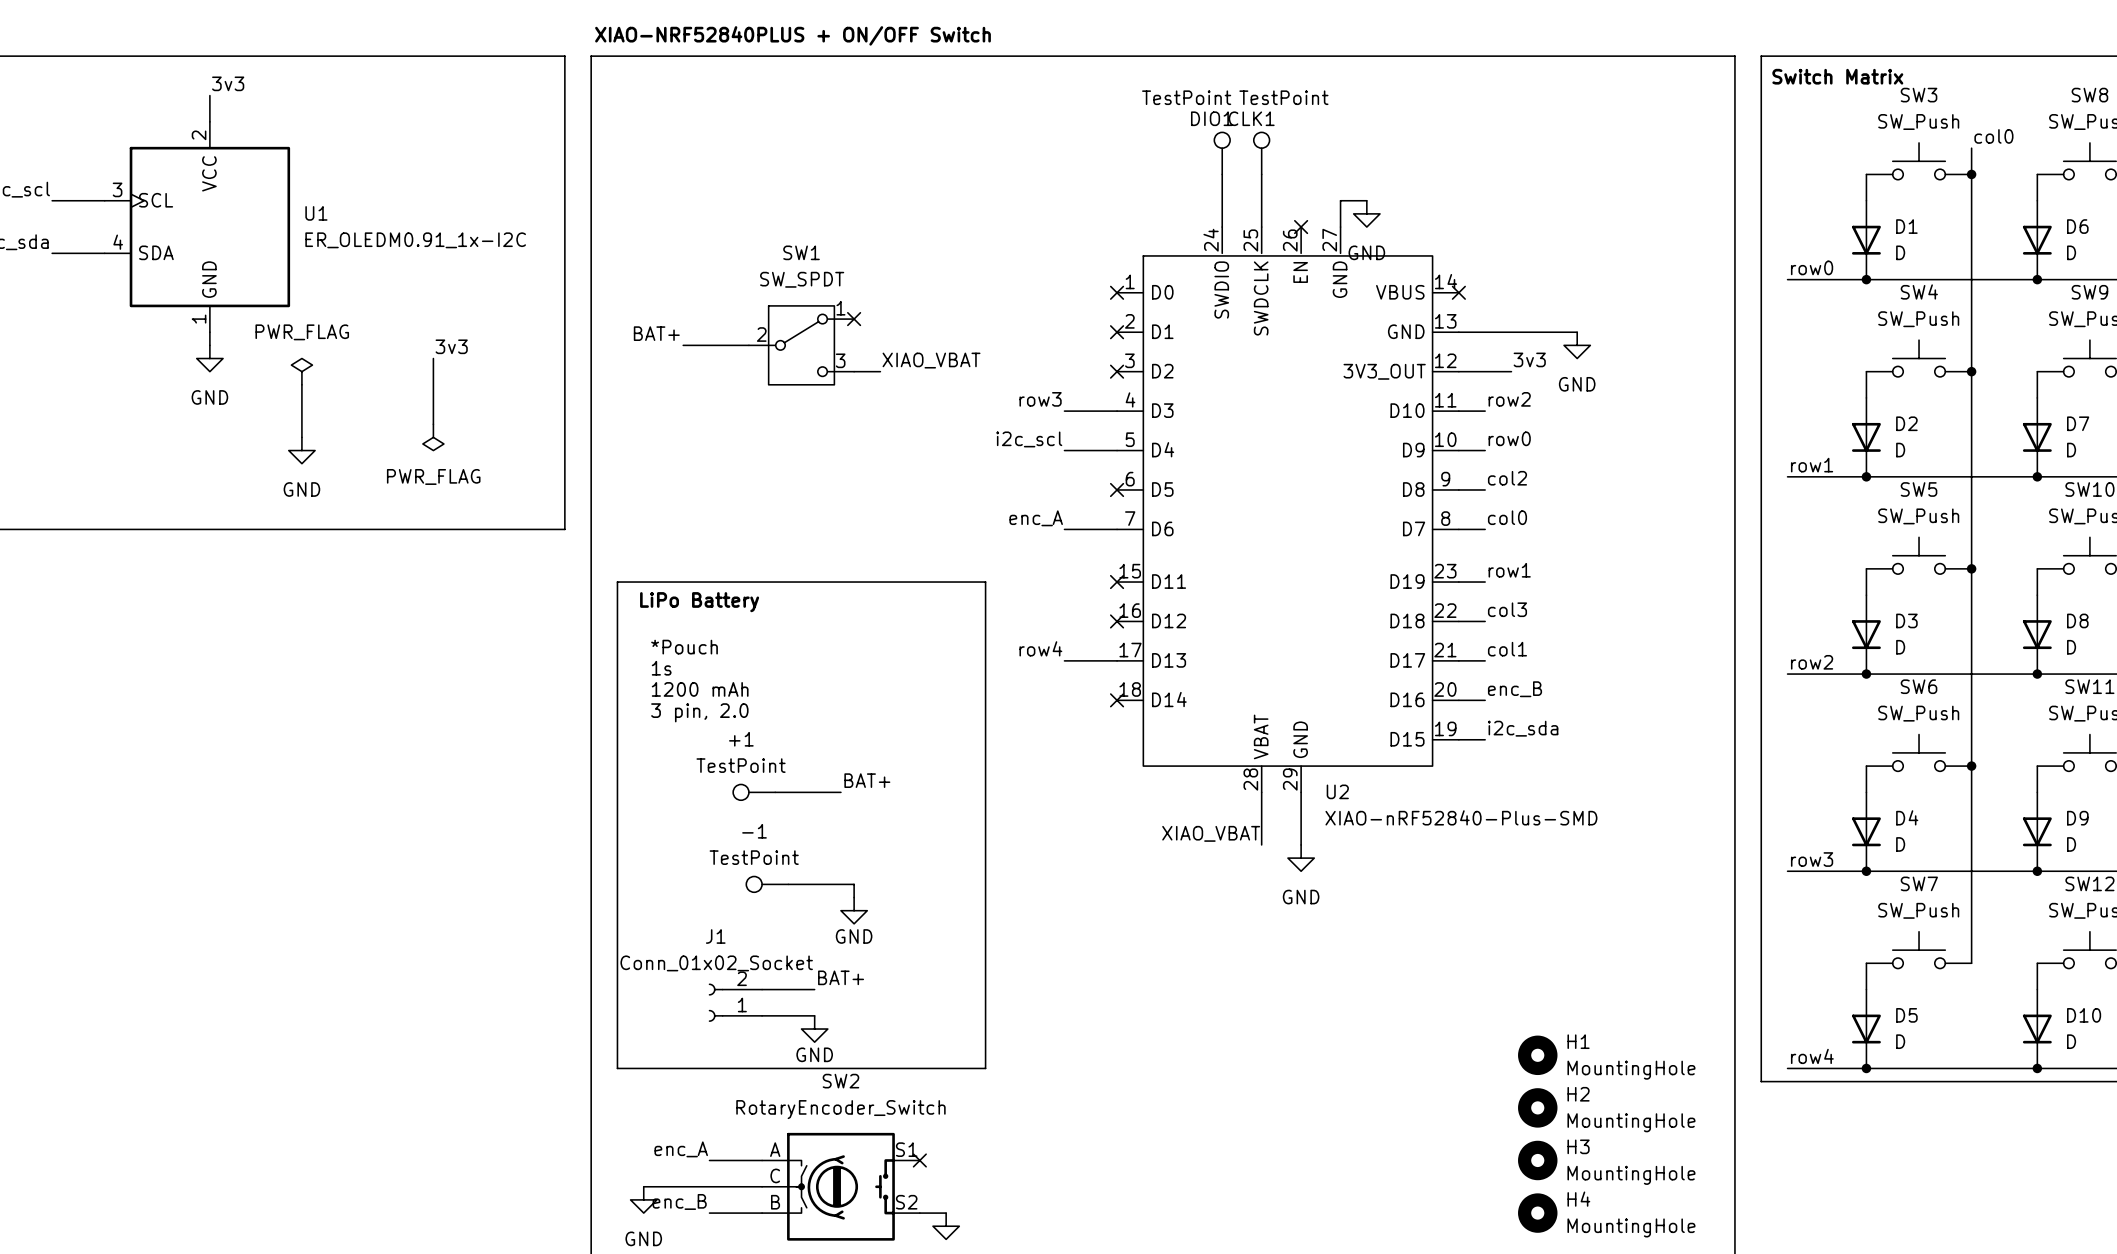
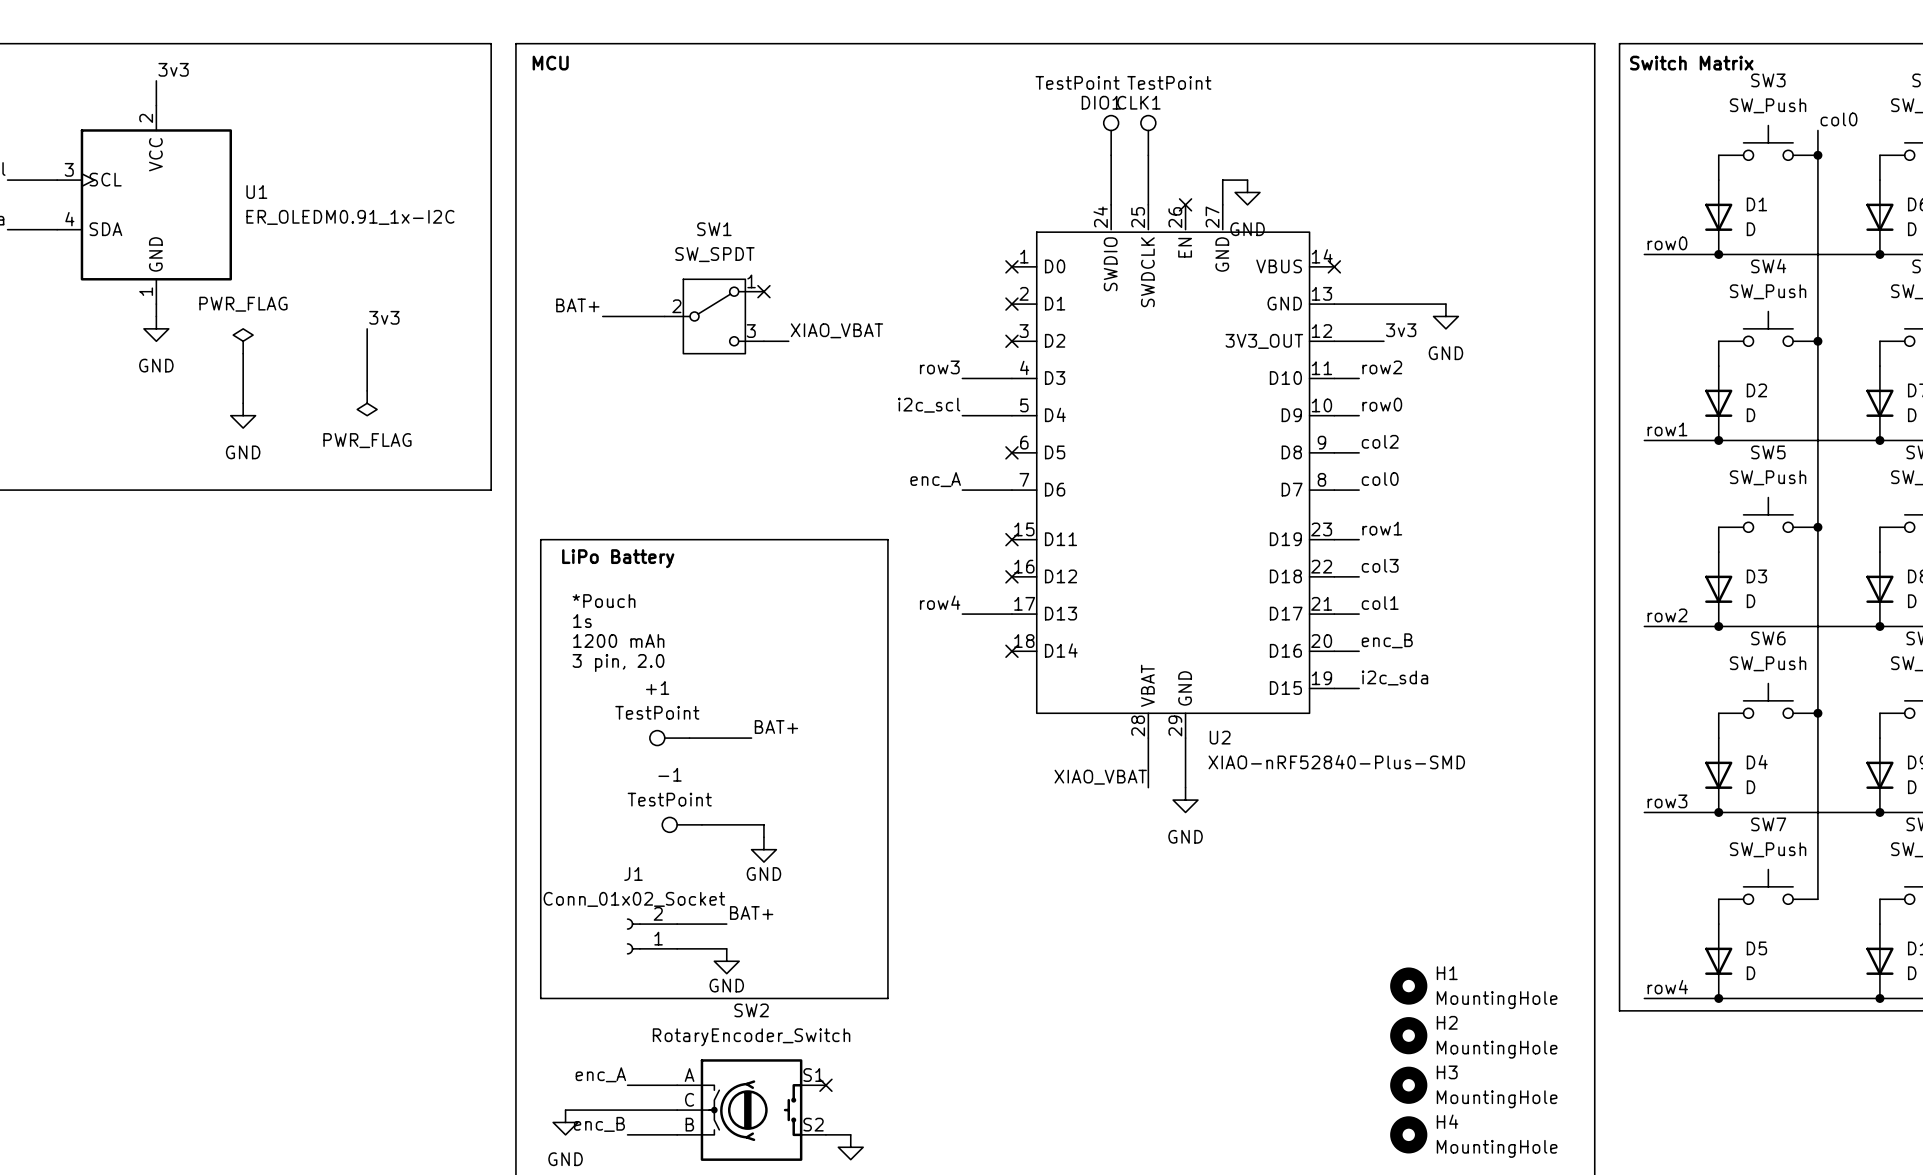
text: XIAO-NRF52840PLUS + ON/OFF Switch (793, 35) -> none
text: none -> MCU (550, 63)

